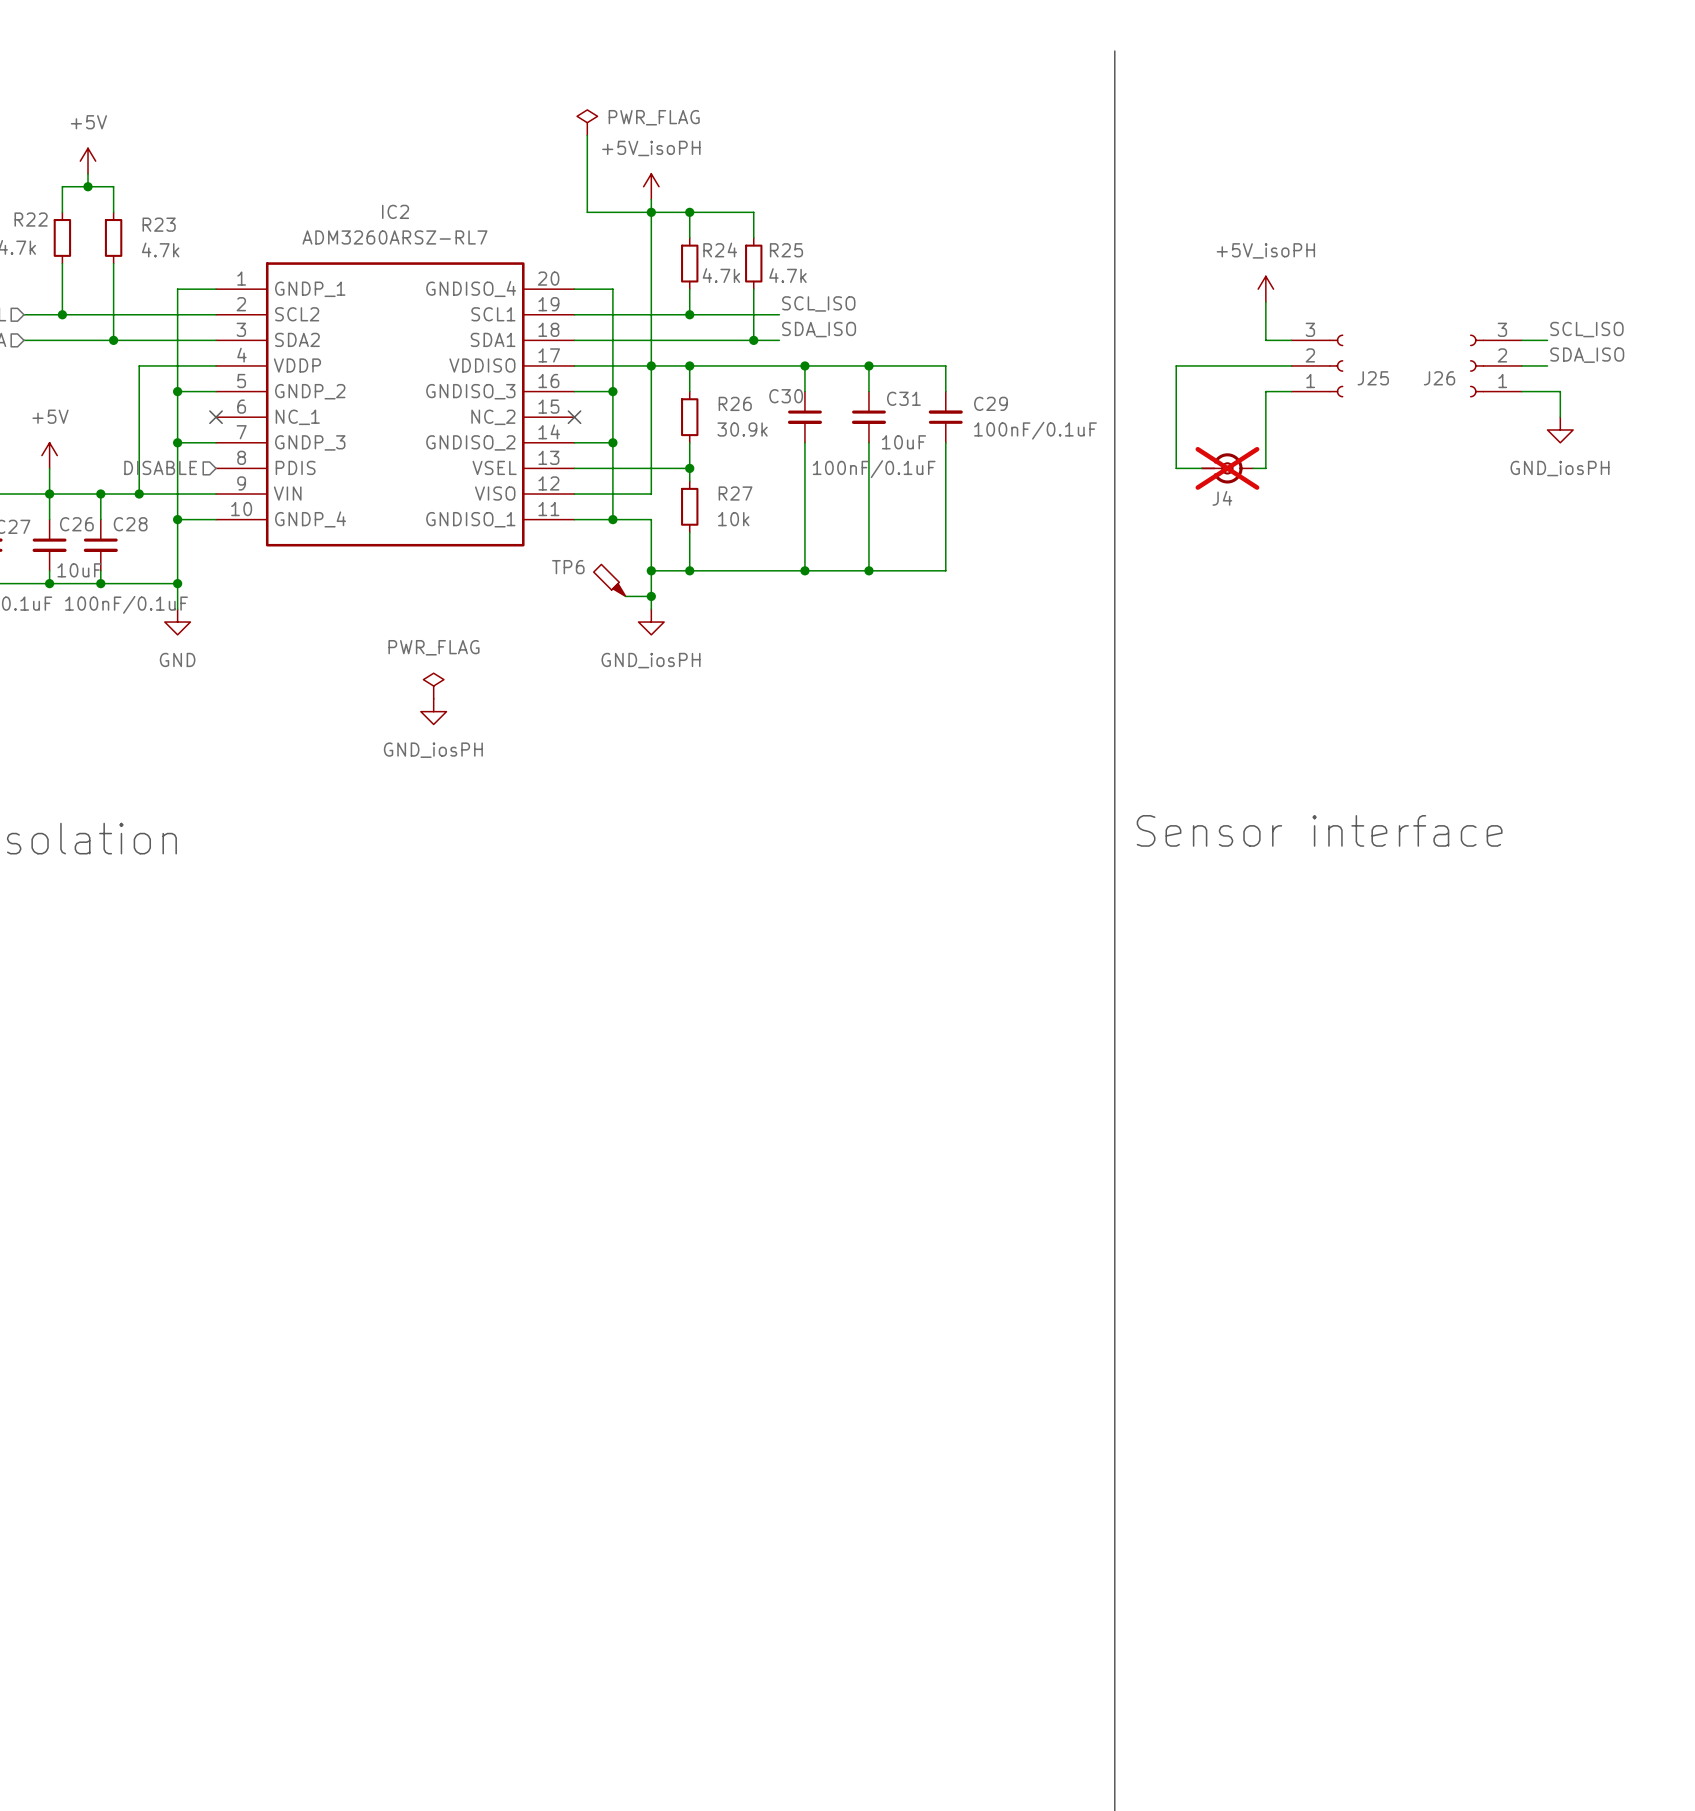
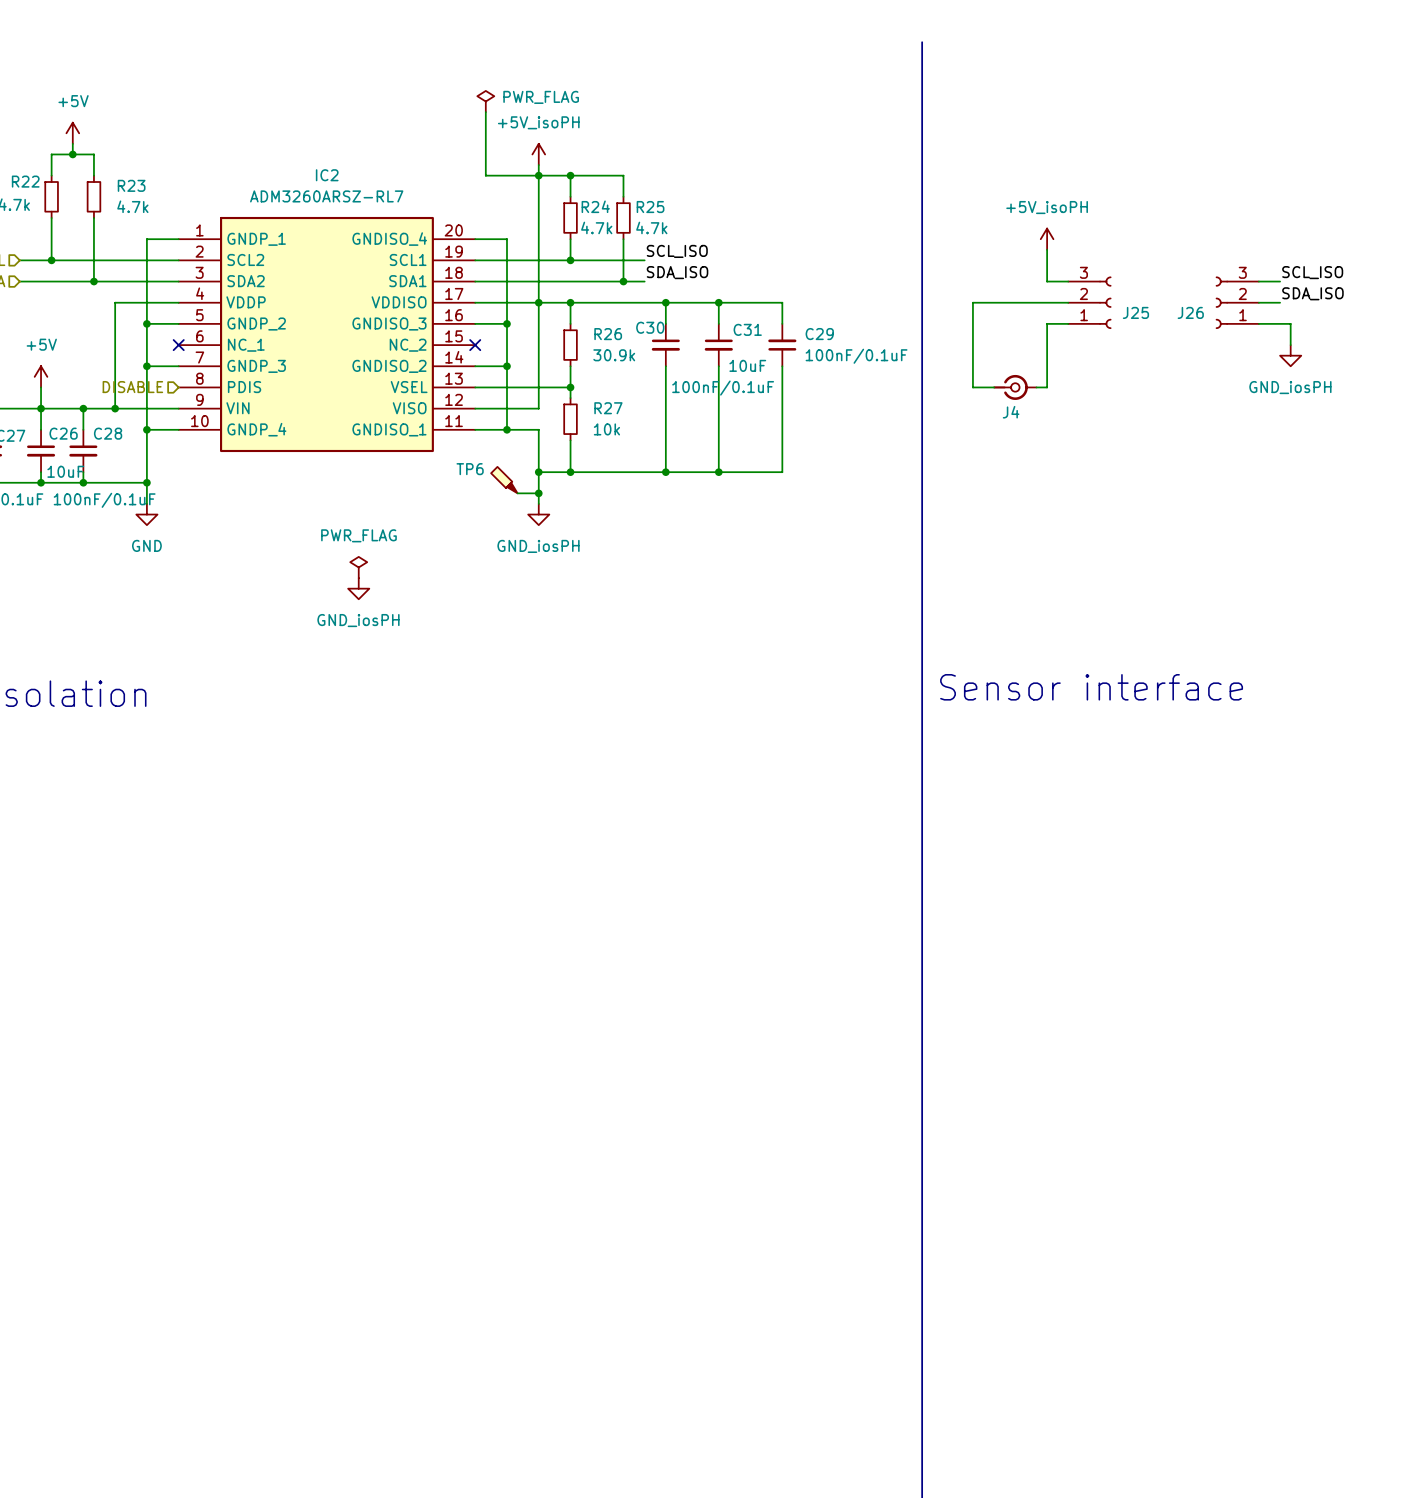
J4 do-not-place cross: (1227, 468) -> none

